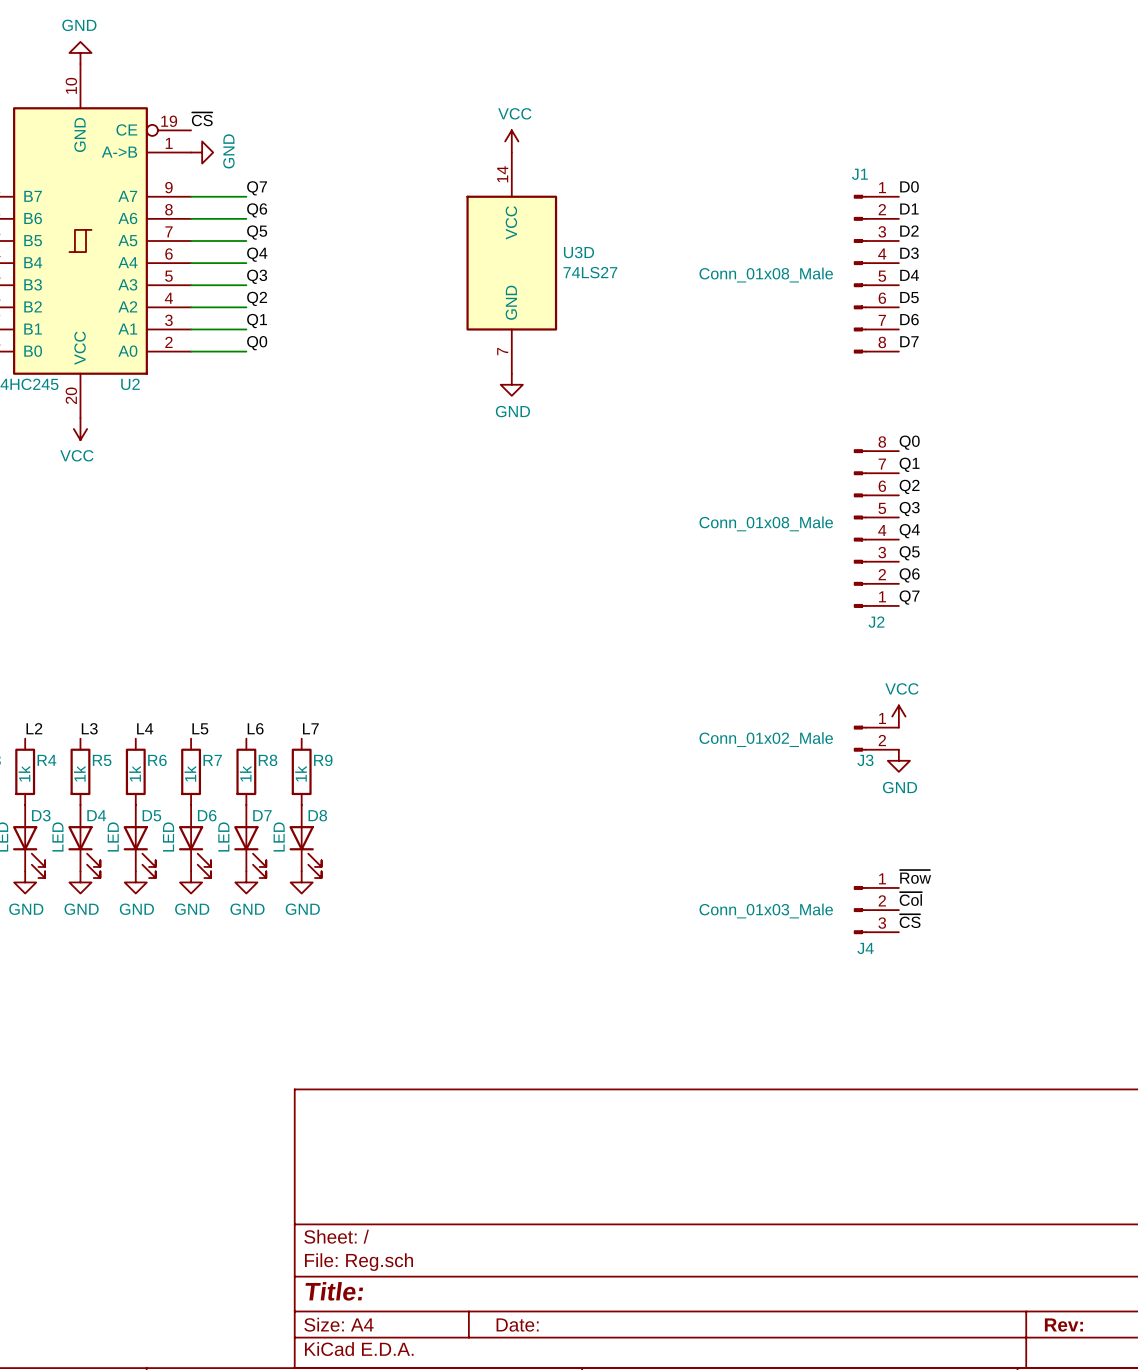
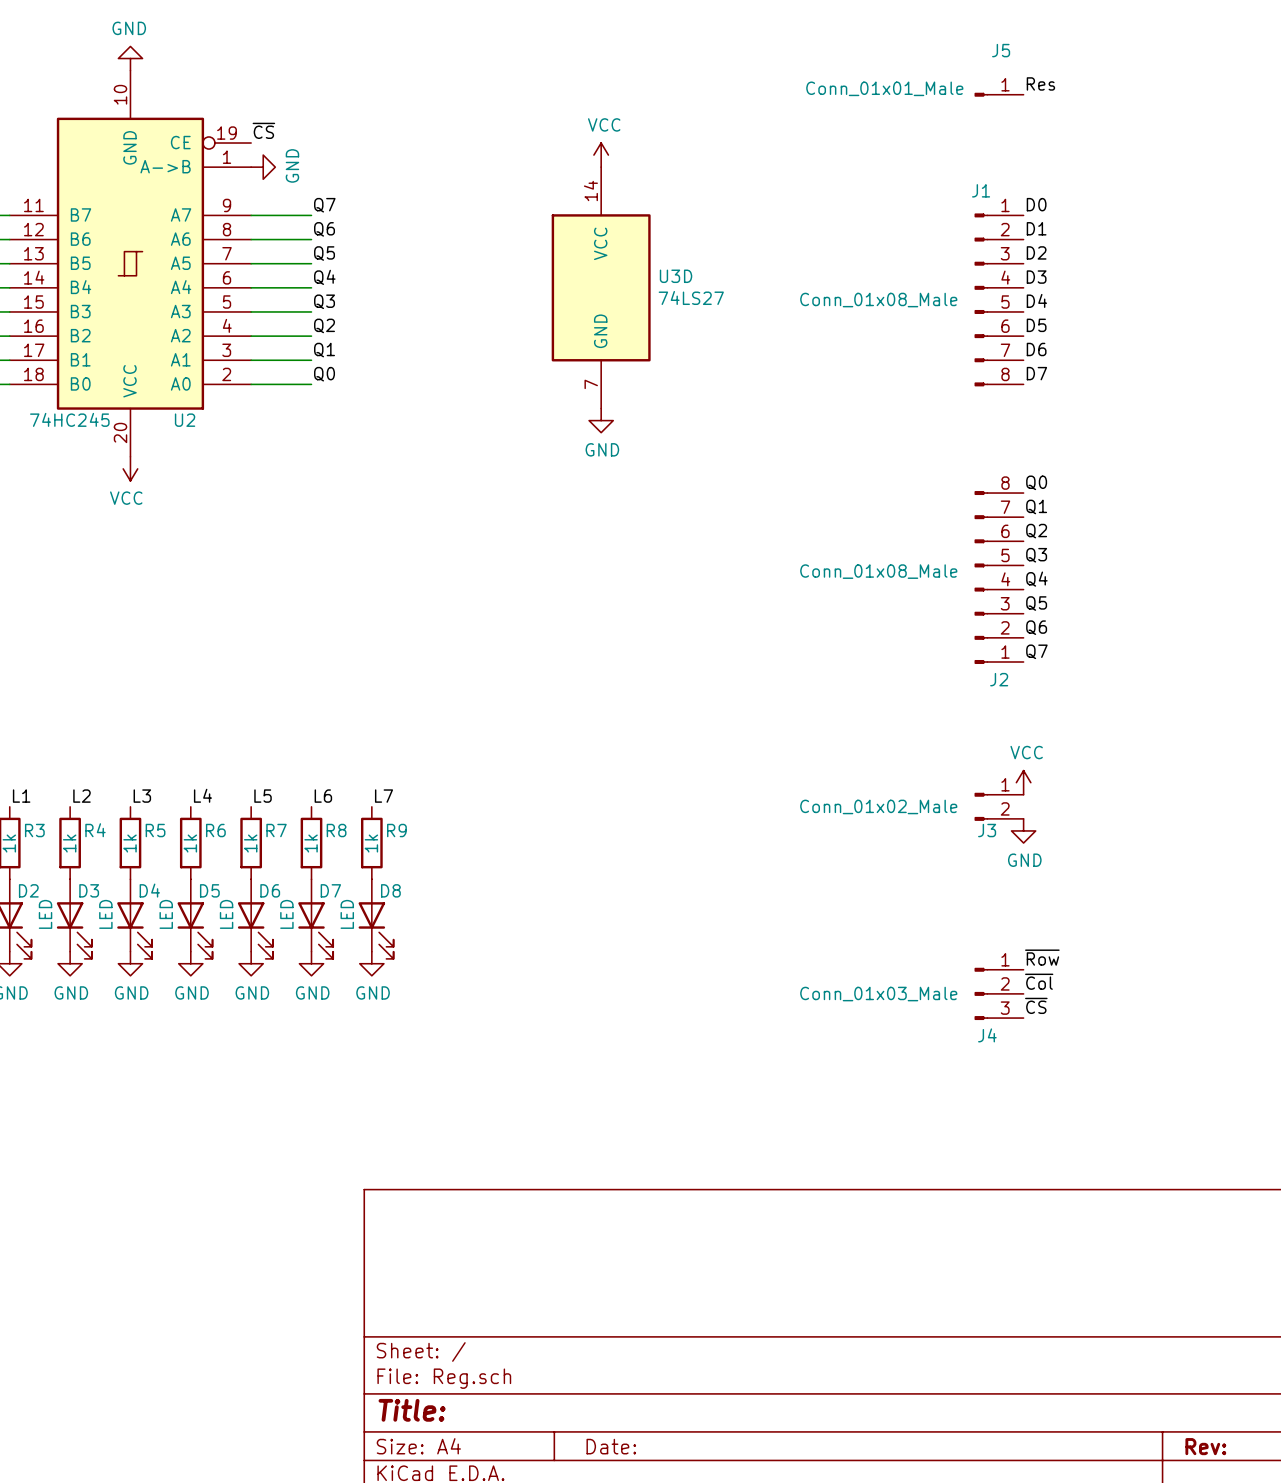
label: none -> Res (1040, 83)
J5: none -> Conn_01x01_Male (999, 94)

